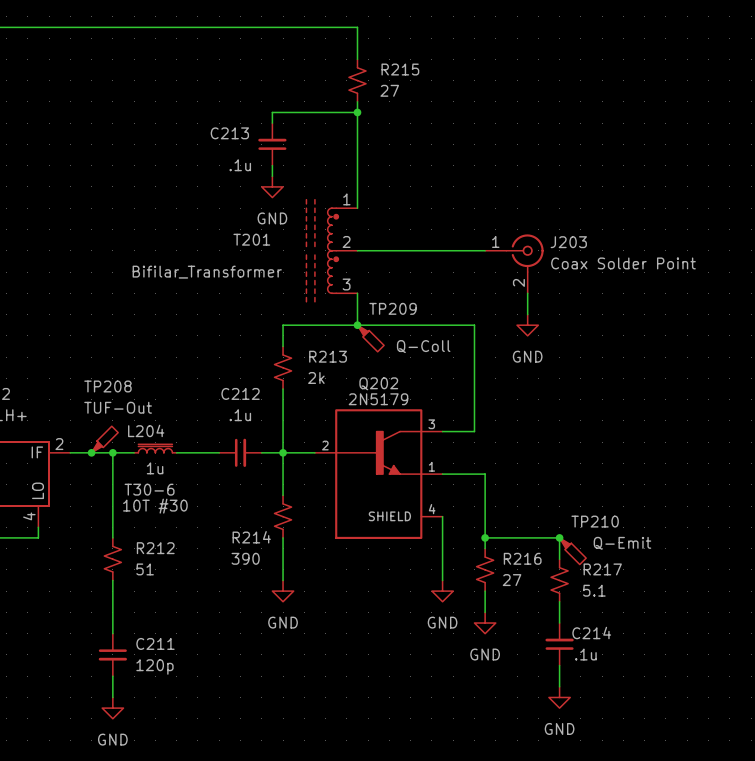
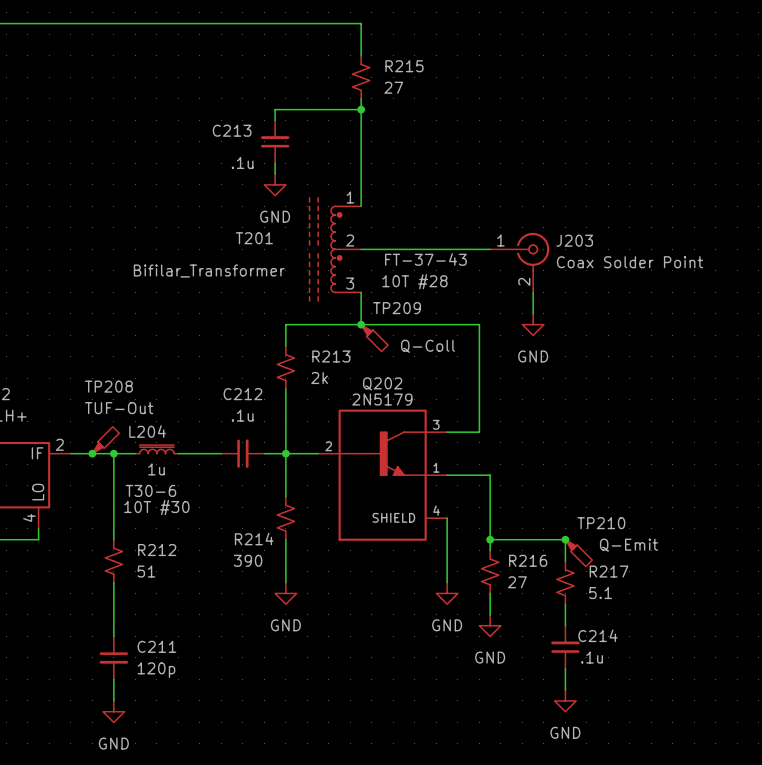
T201 text: none -> FT-37-43 (425, 259)
T201 text: none -> 10T #28 (414, 281)

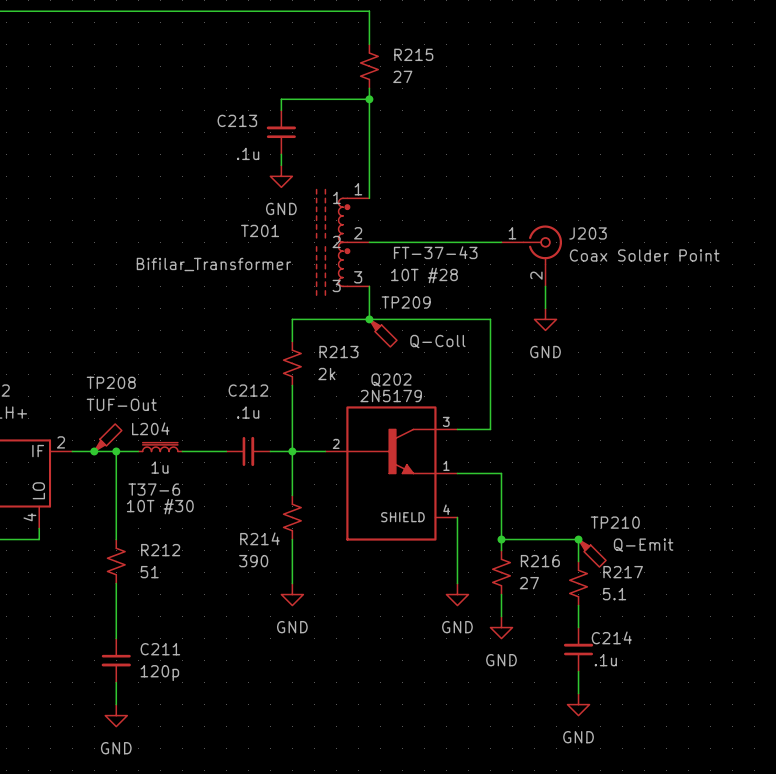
T201 pin name: none -> 1 (336, 197)
T201 pin name: none -> 2 (336, 241)
T201 pin name: none -> 3 (336, 285)
L204 text: T30-6 (150, 490) -> T37-6 (154, 489)

